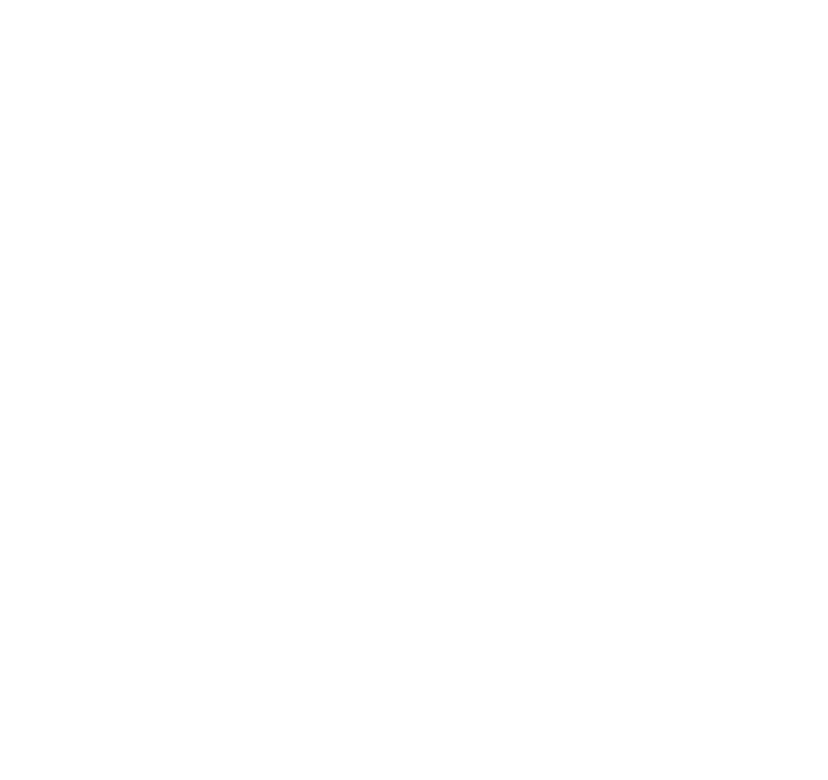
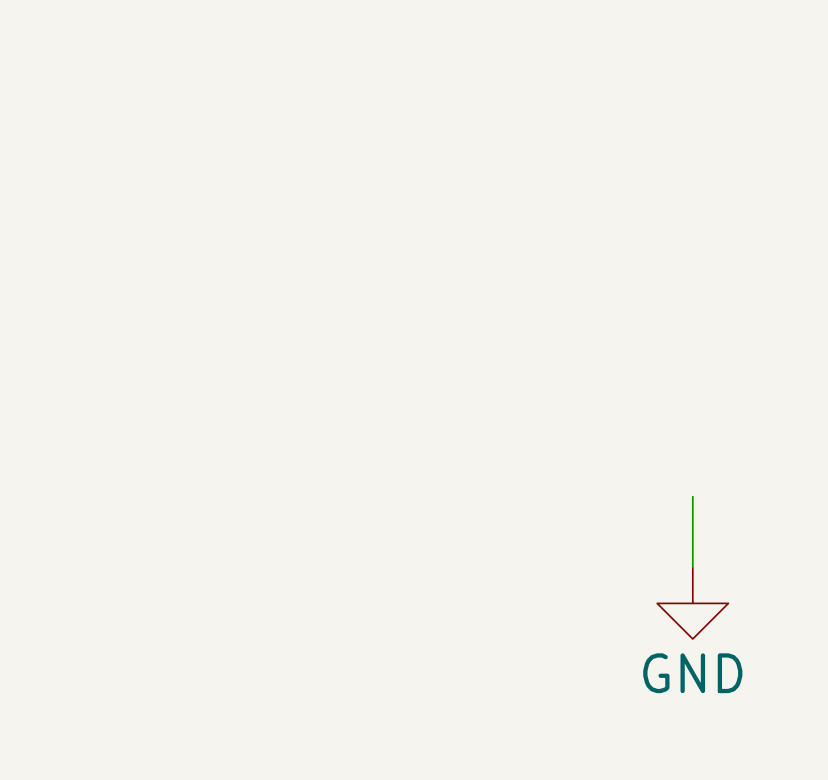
wire: none -> (692, 496) (692, 567)
power symbol: none -> GND (692, 603)

